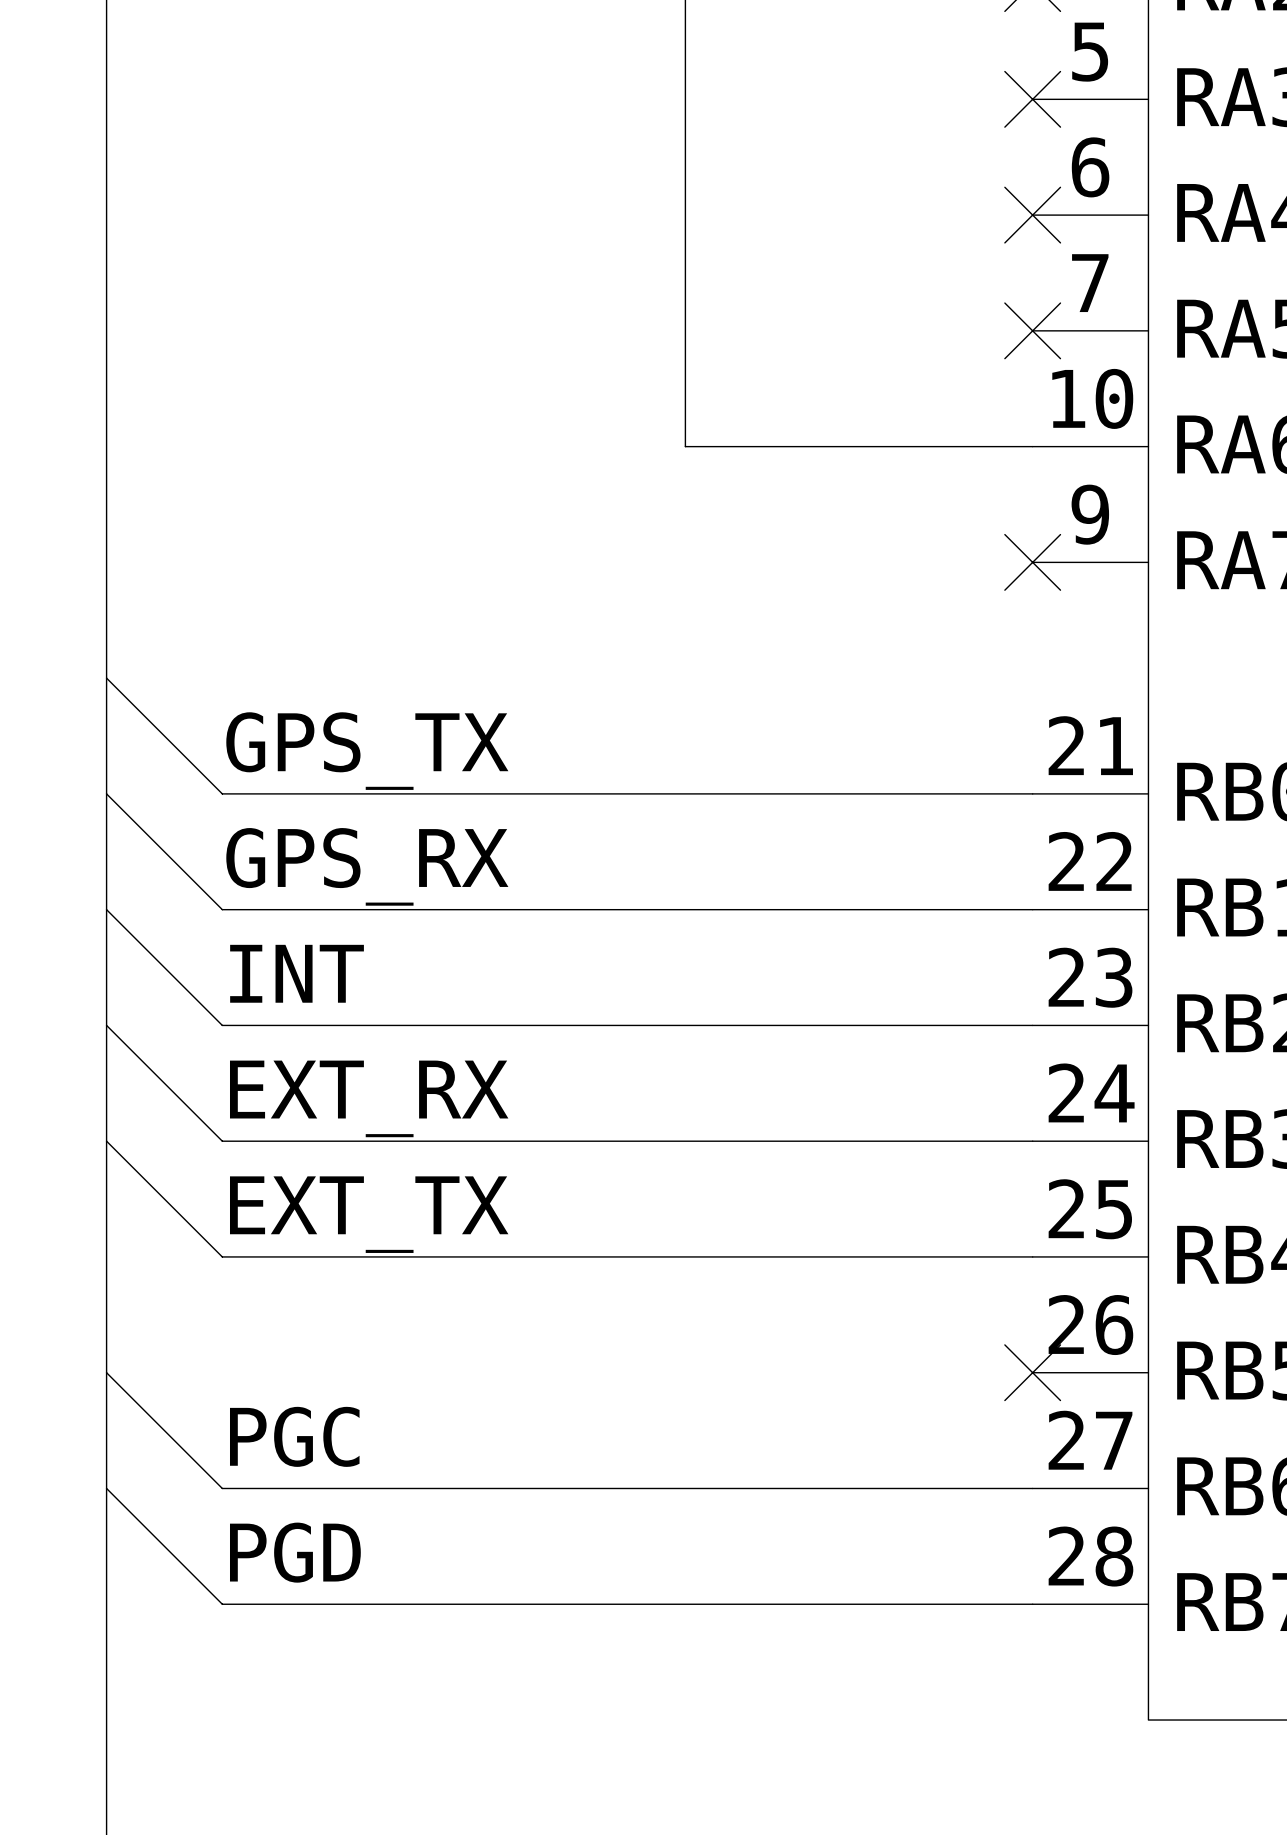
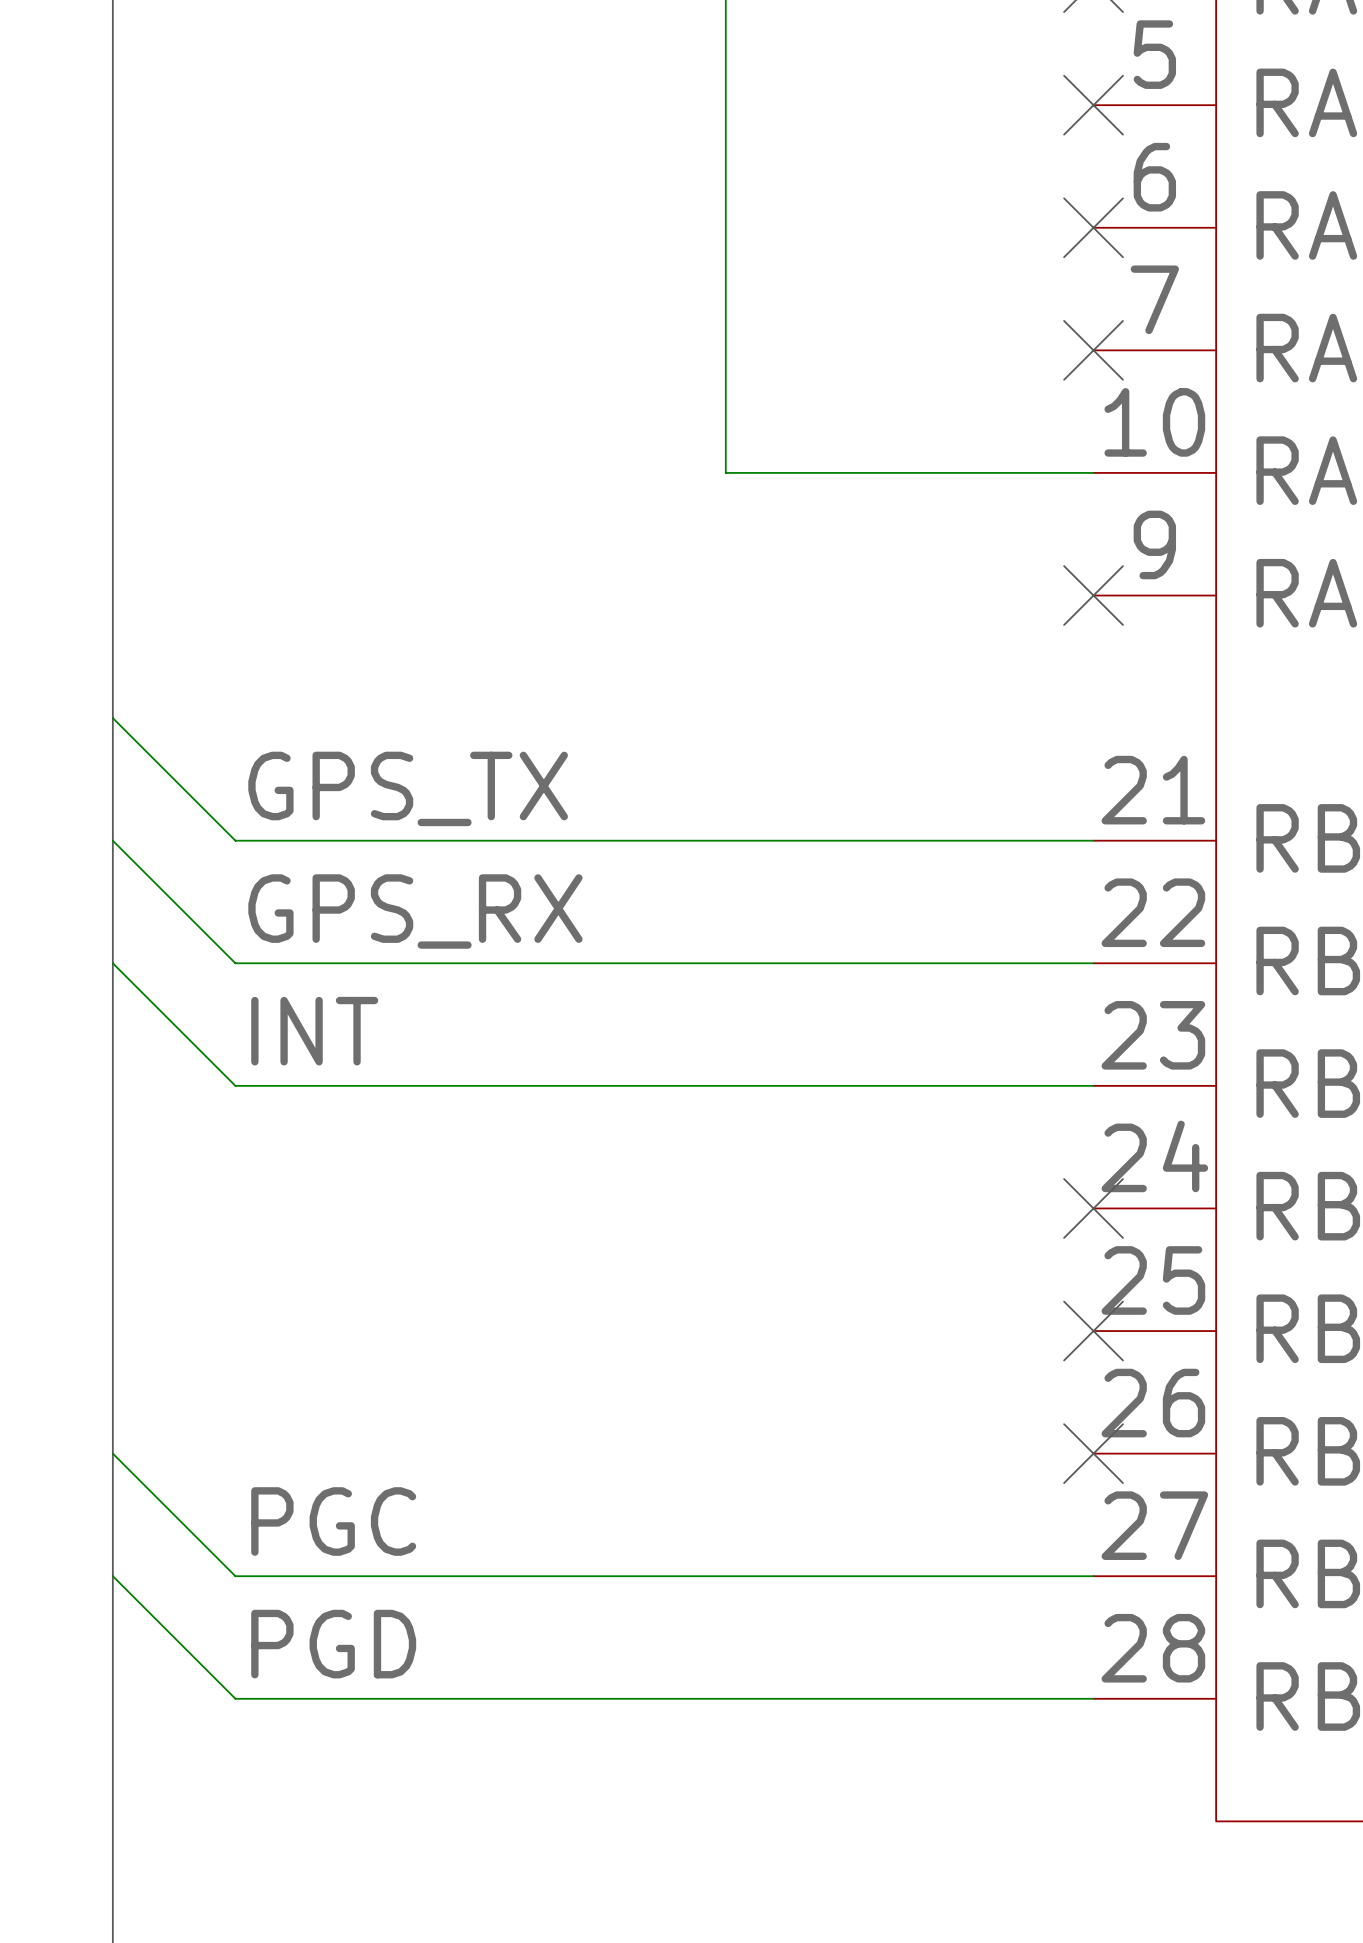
wire: (106, 1025) (222, 1141) (1032, 1141) -> none
label: EXT_RX (369, 1098) -> none
wire: (106, 1141) (222, 1256) (1032, 1256) -> none
no-connect mark: none -> (1093, 1208)
label: EXT_TX (369, 1214) -> none
no-connect mark: none -> (1093, 1331)

